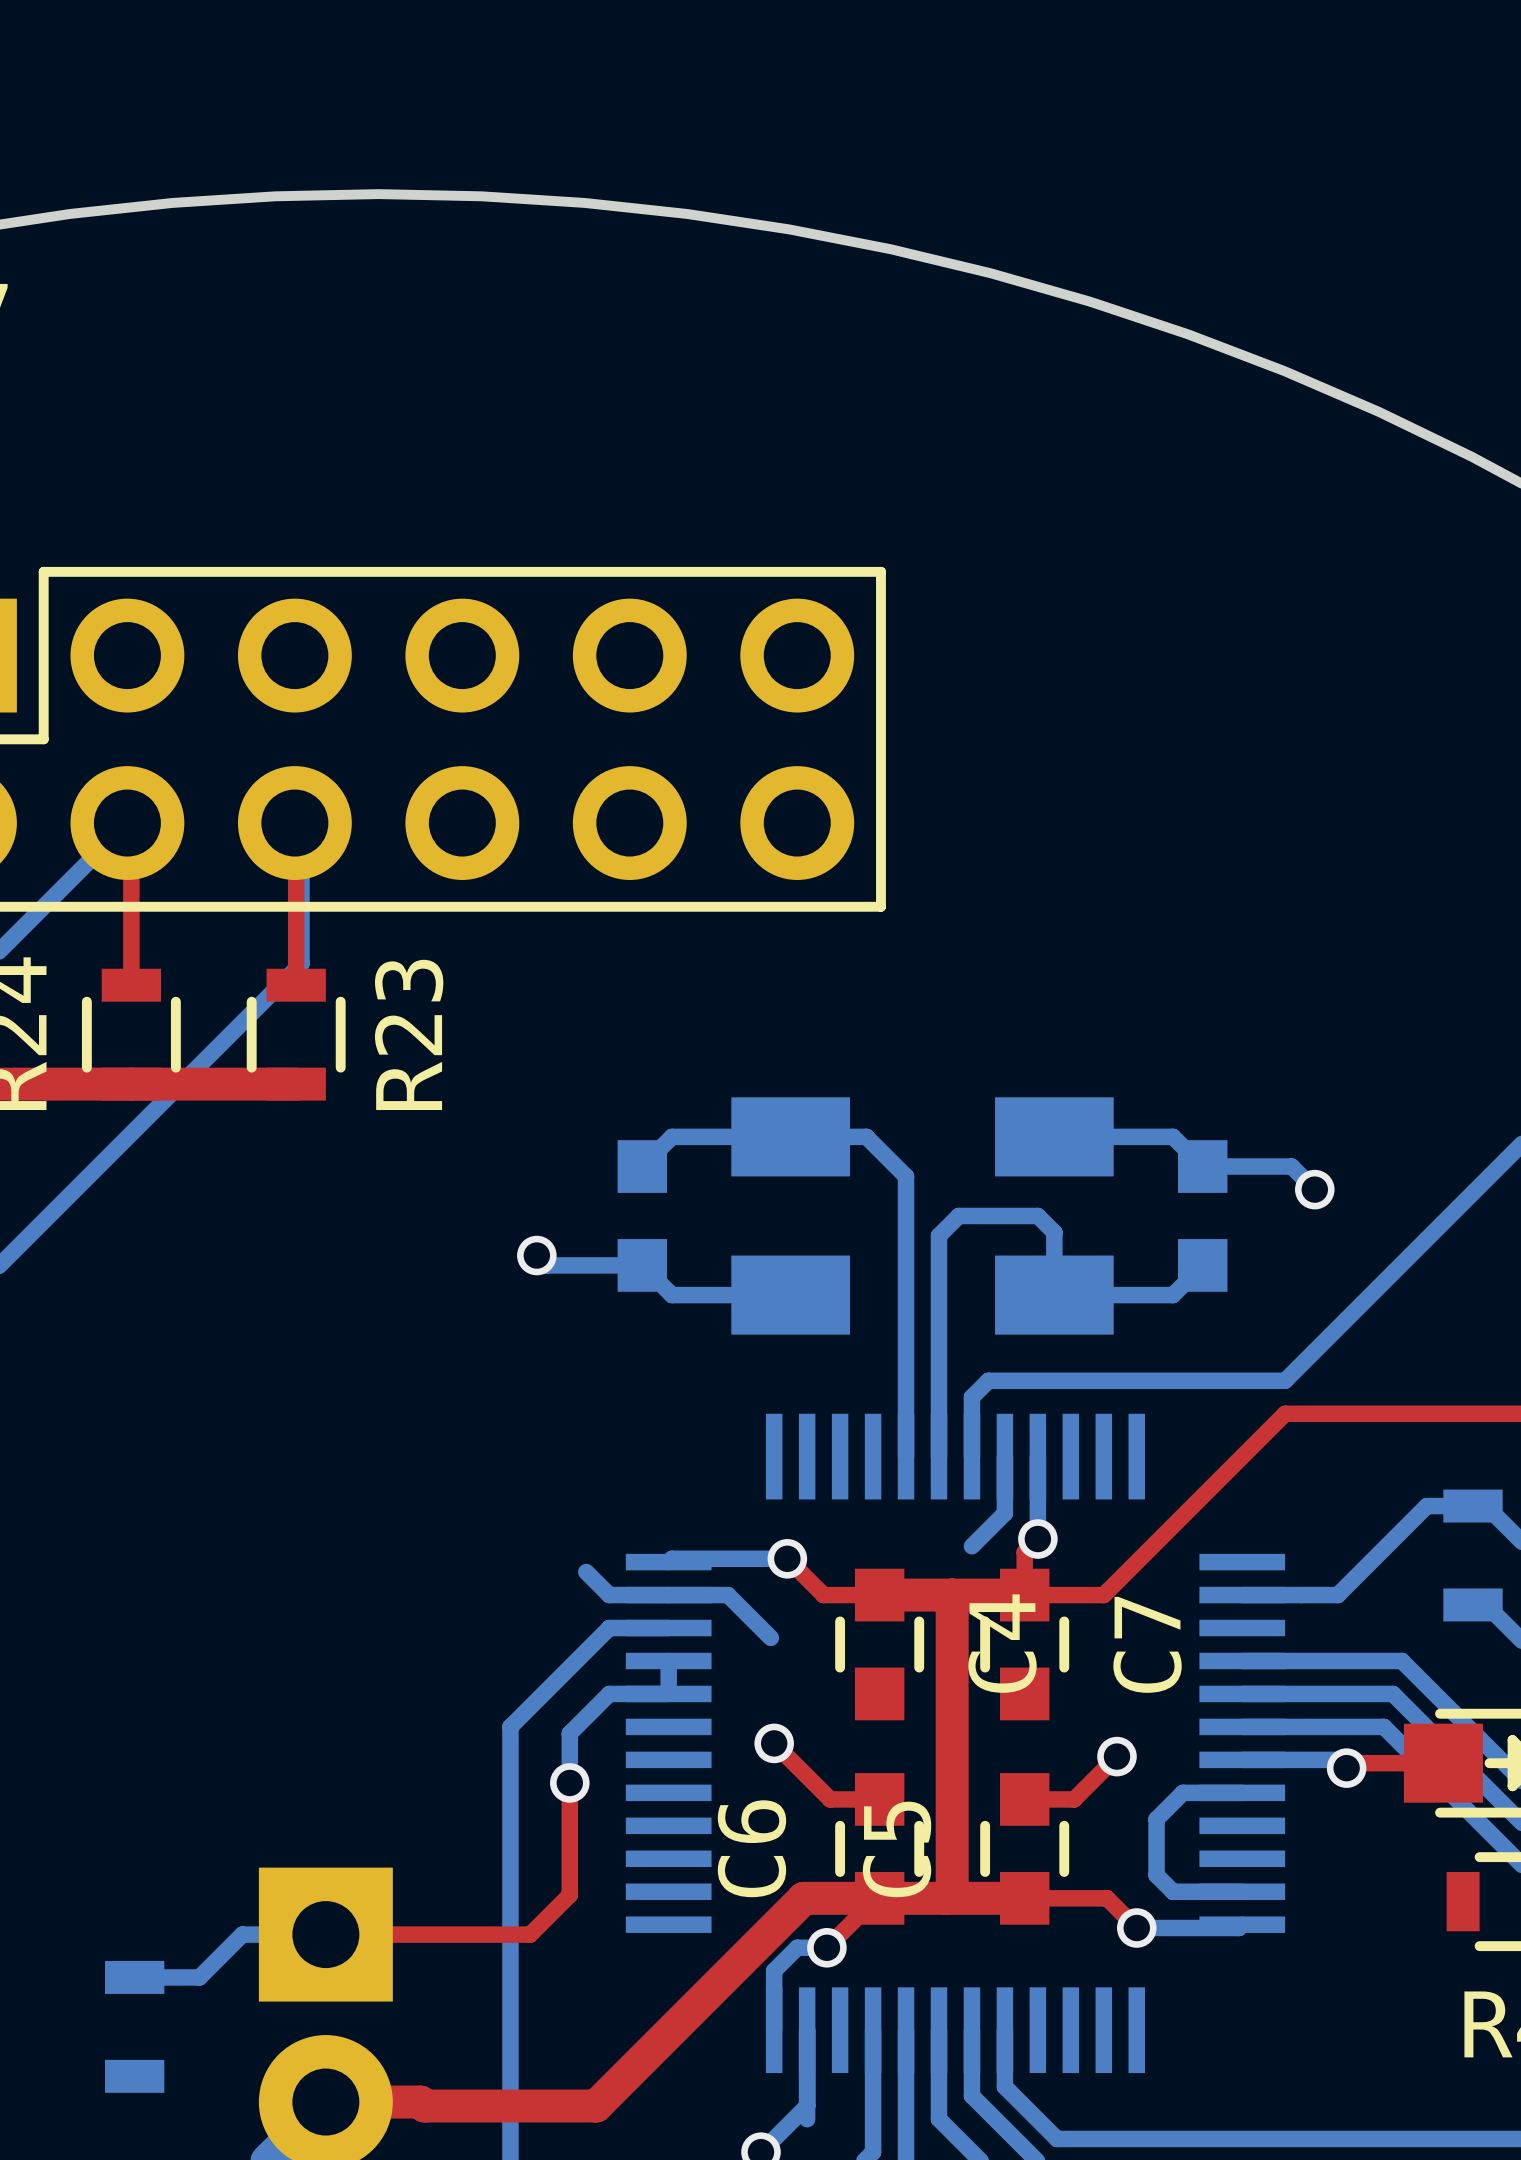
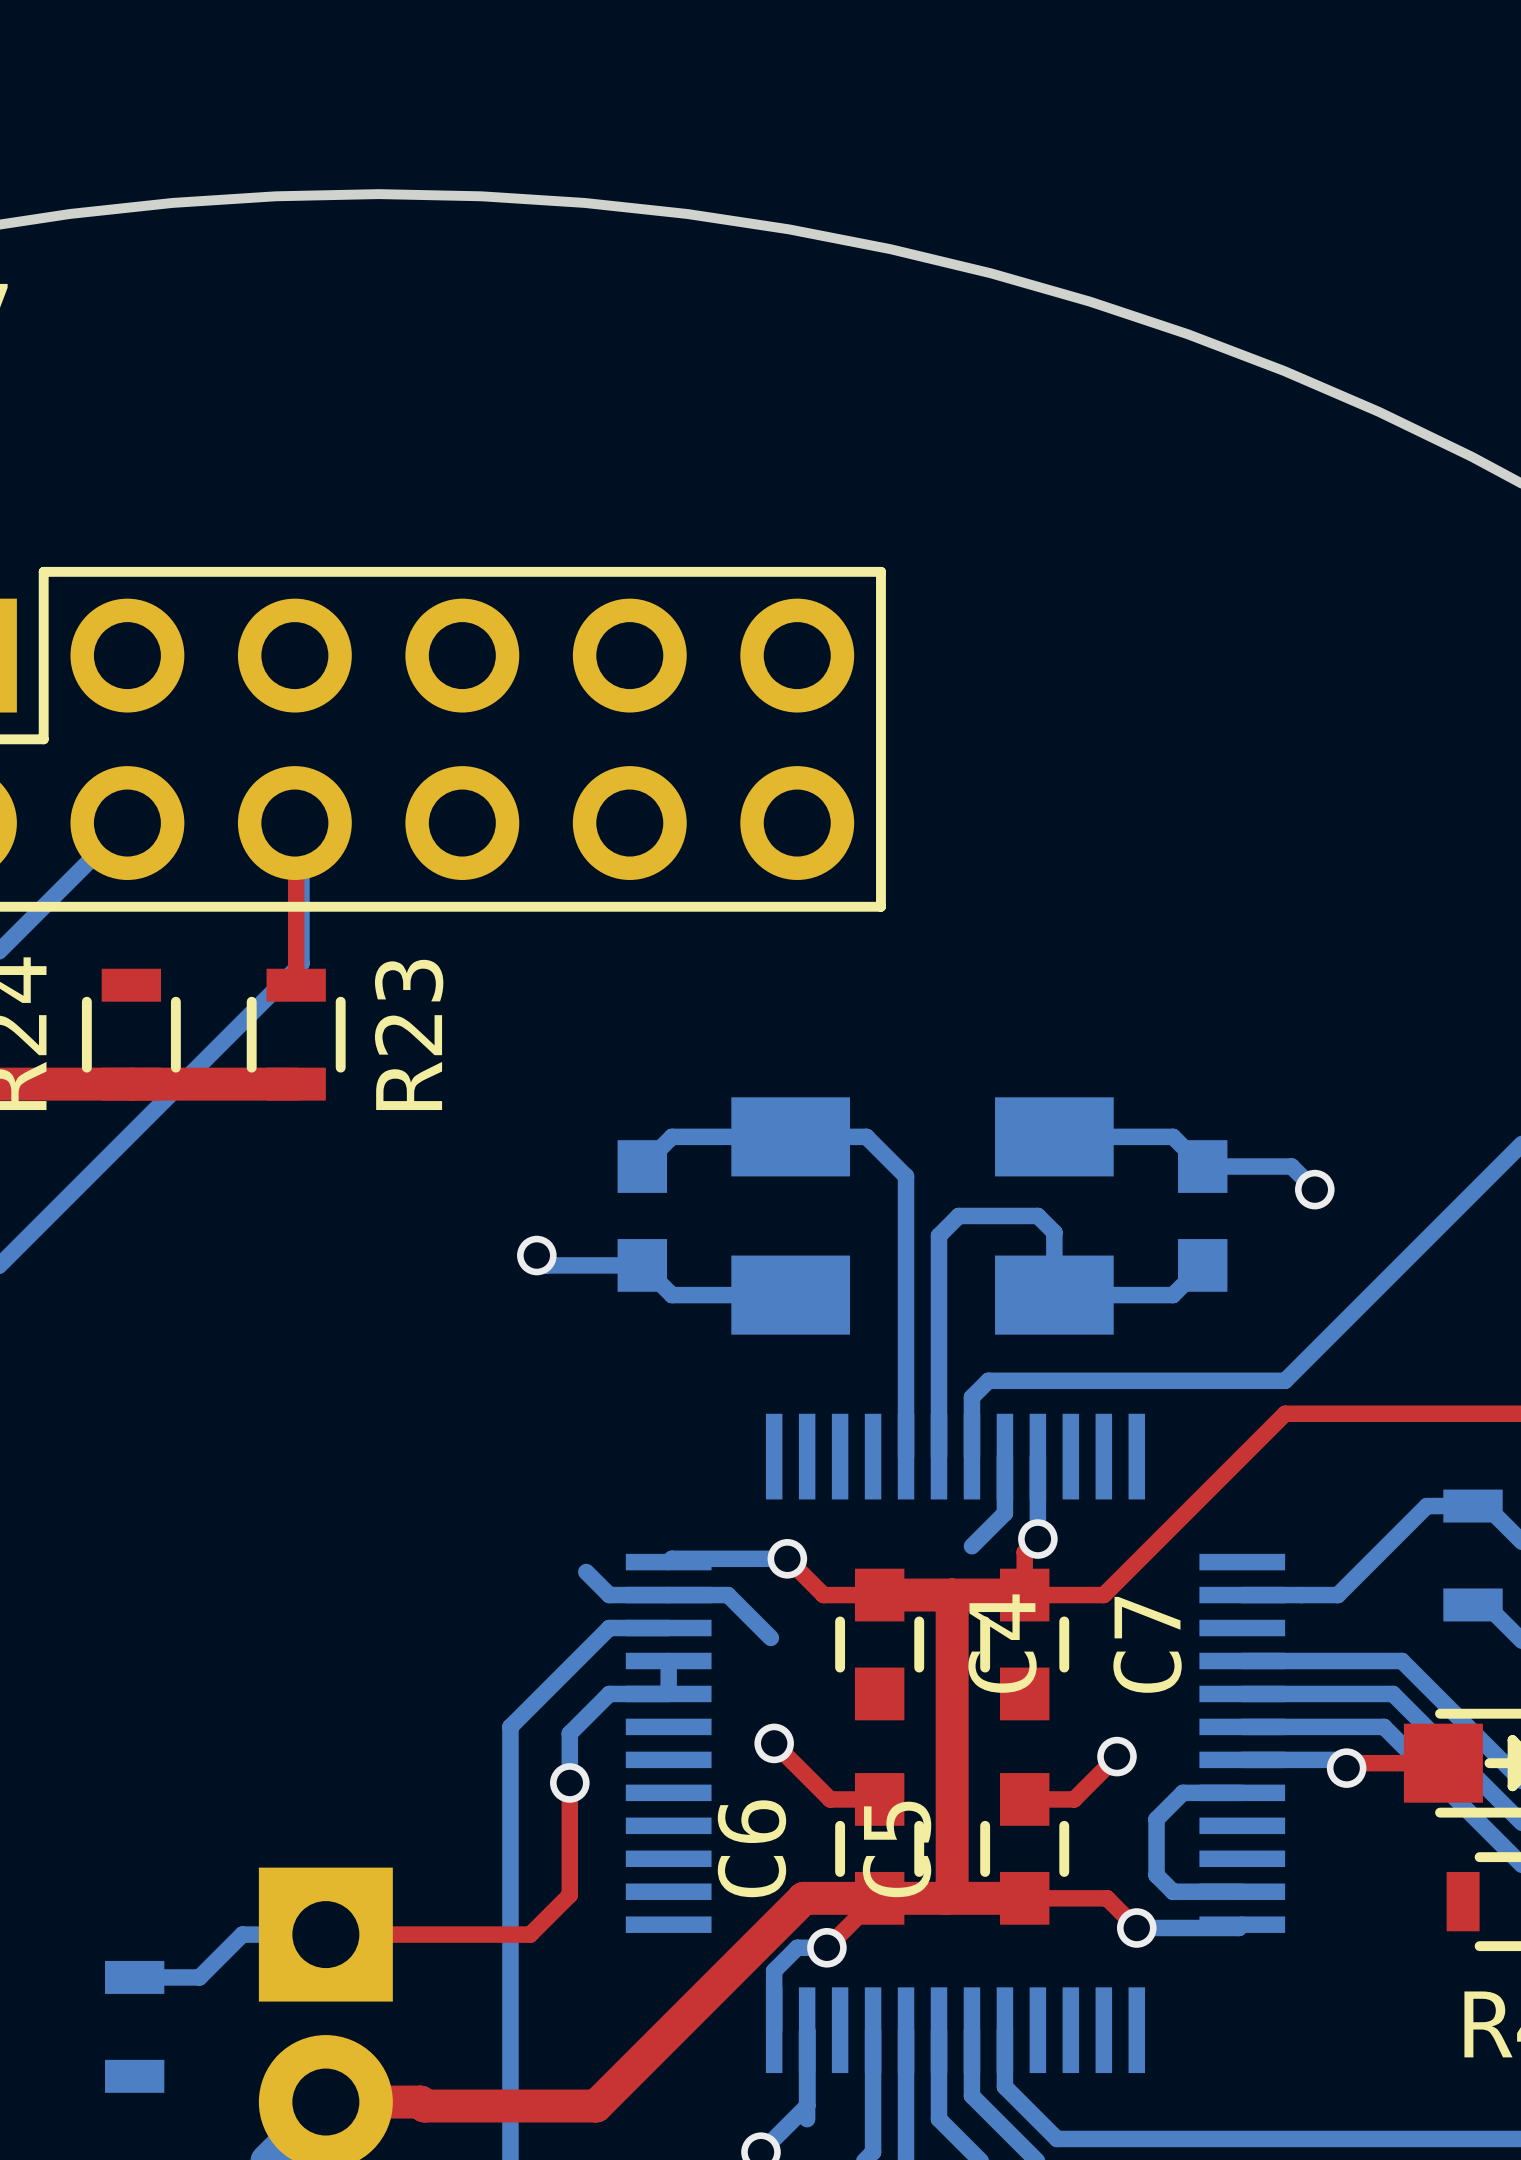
top track: (127, 823) (131, 827) (131, 985) -> none

